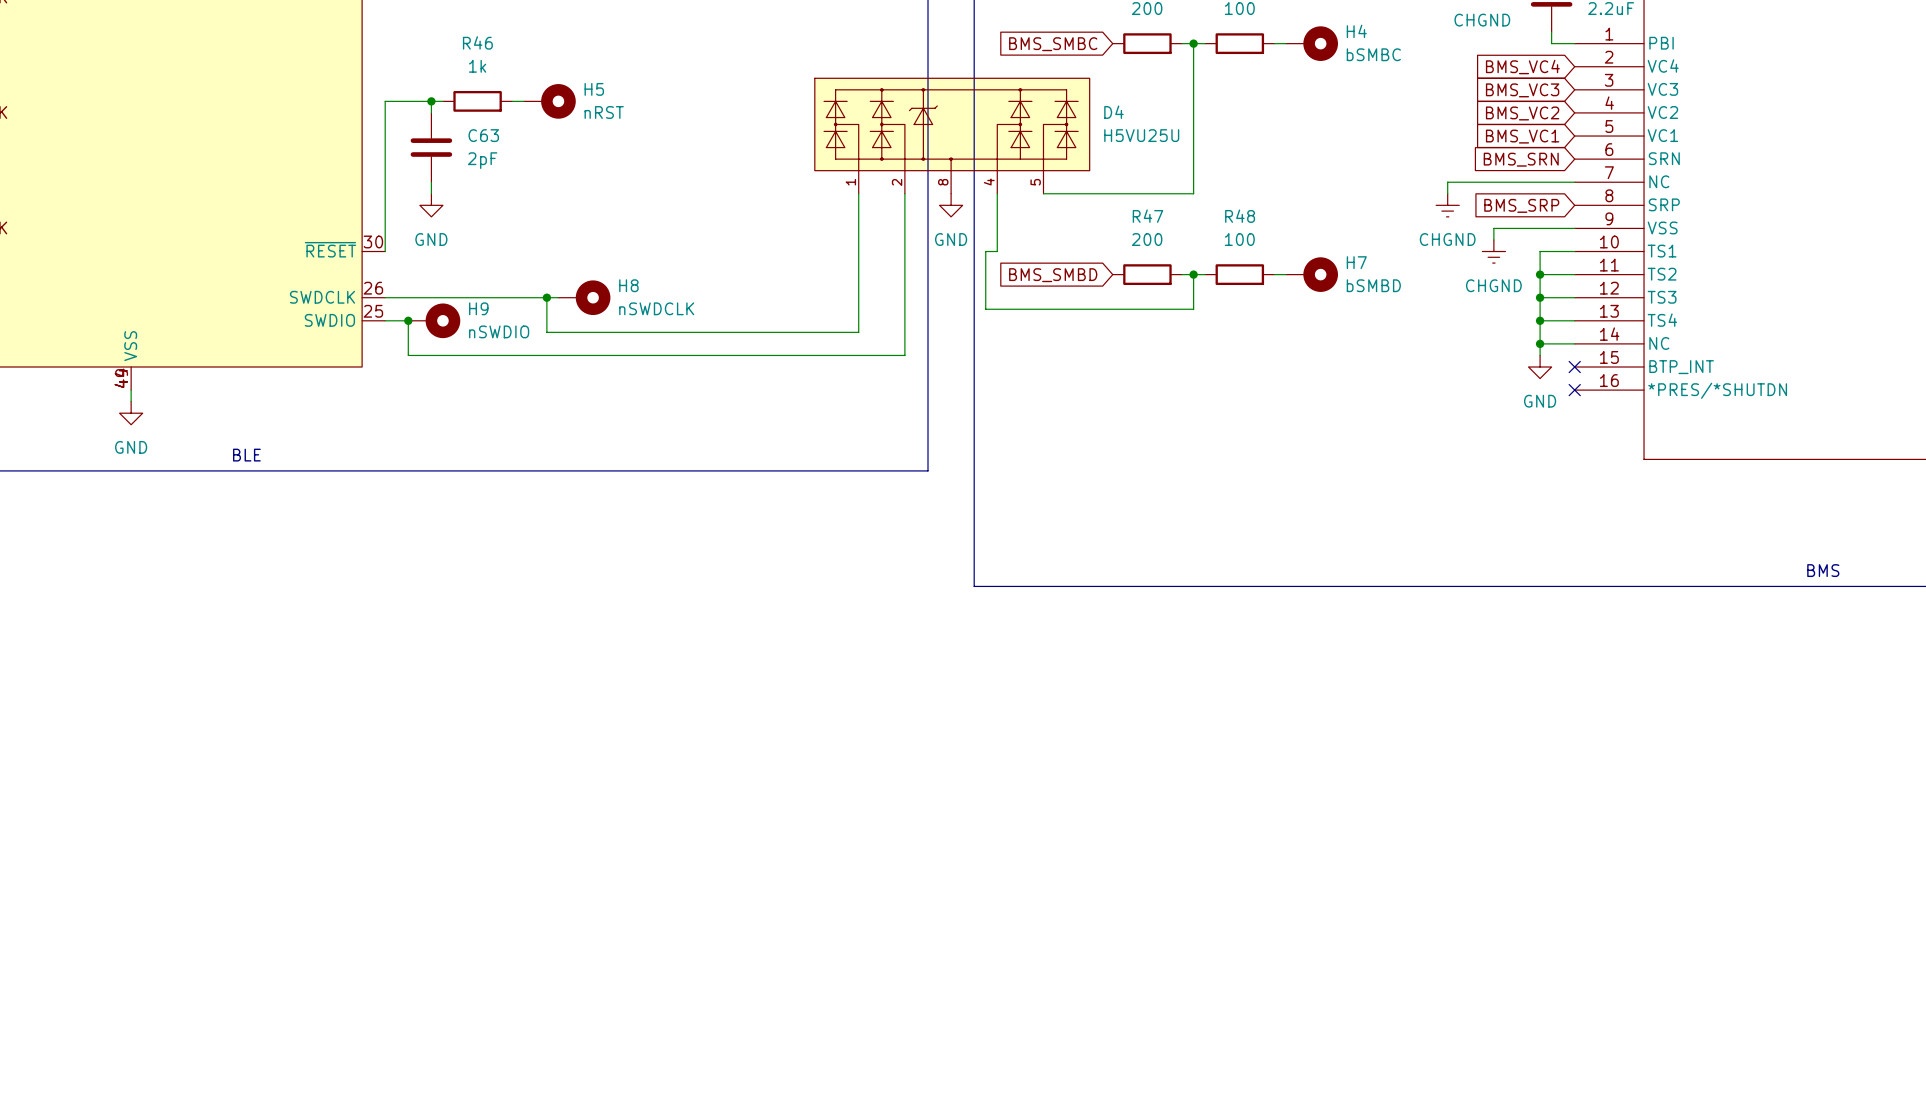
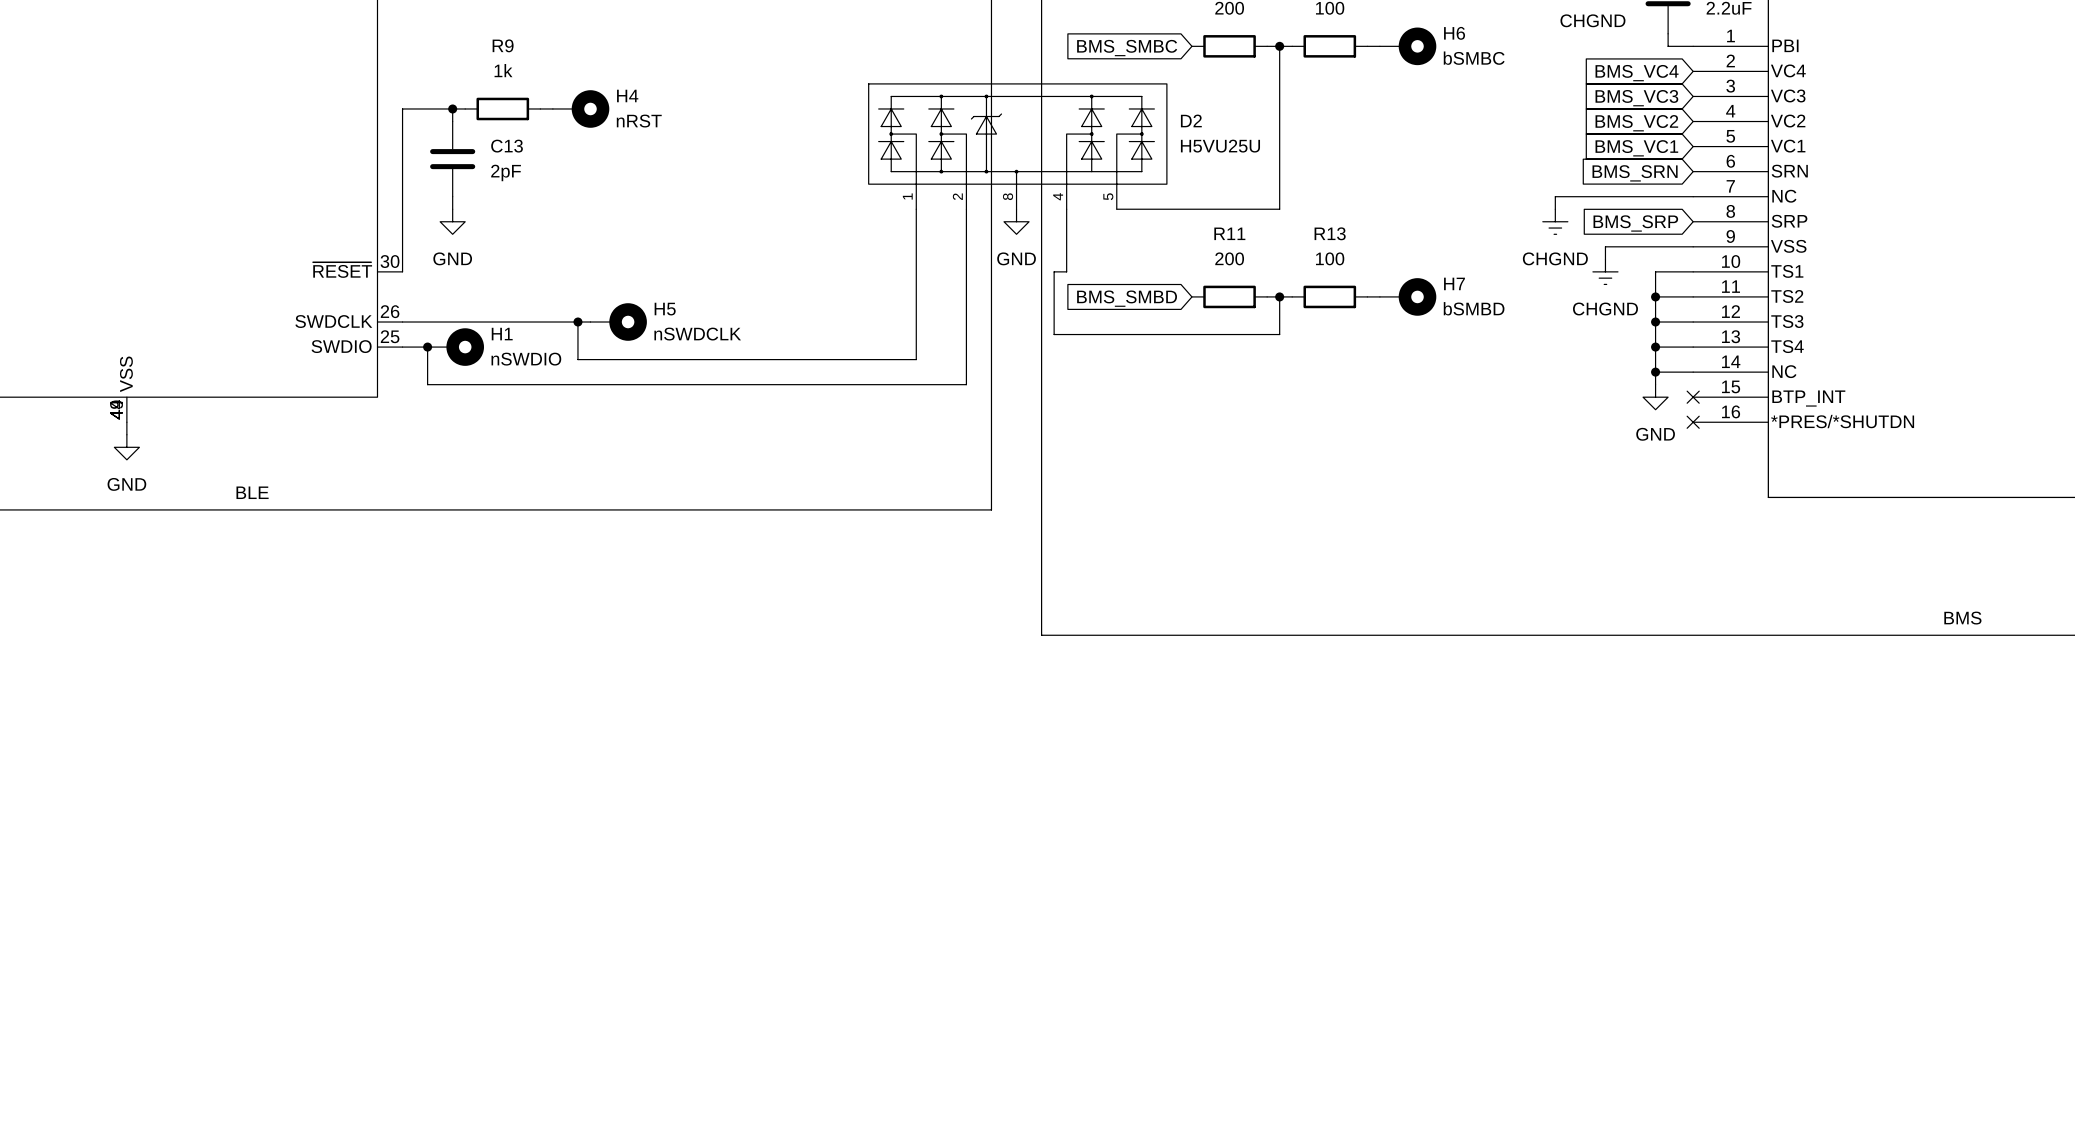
H4 name: H4 (1356, 31) -> H6 (1454, 33)
R46 name: R46 (477, 42) -> R9 (503, 45)
H5 name: H5 (594, 89) -> H4 (627, 95)
D4 name: D4 (1113, 112) -> D2 (1191, 120)
C63 name: C63 (483, 135) -> C13 (507, 146)
R47 name: R47 (1147, 216) -> R11 (1229, 233)
R48 name: R48 (1240, 216) -> R13 (1330, 233)
H8 name: H8 (628, 285) -> H5 (665, 309)
H9 name: H9 (478, 308) -> H1 (502, 334)

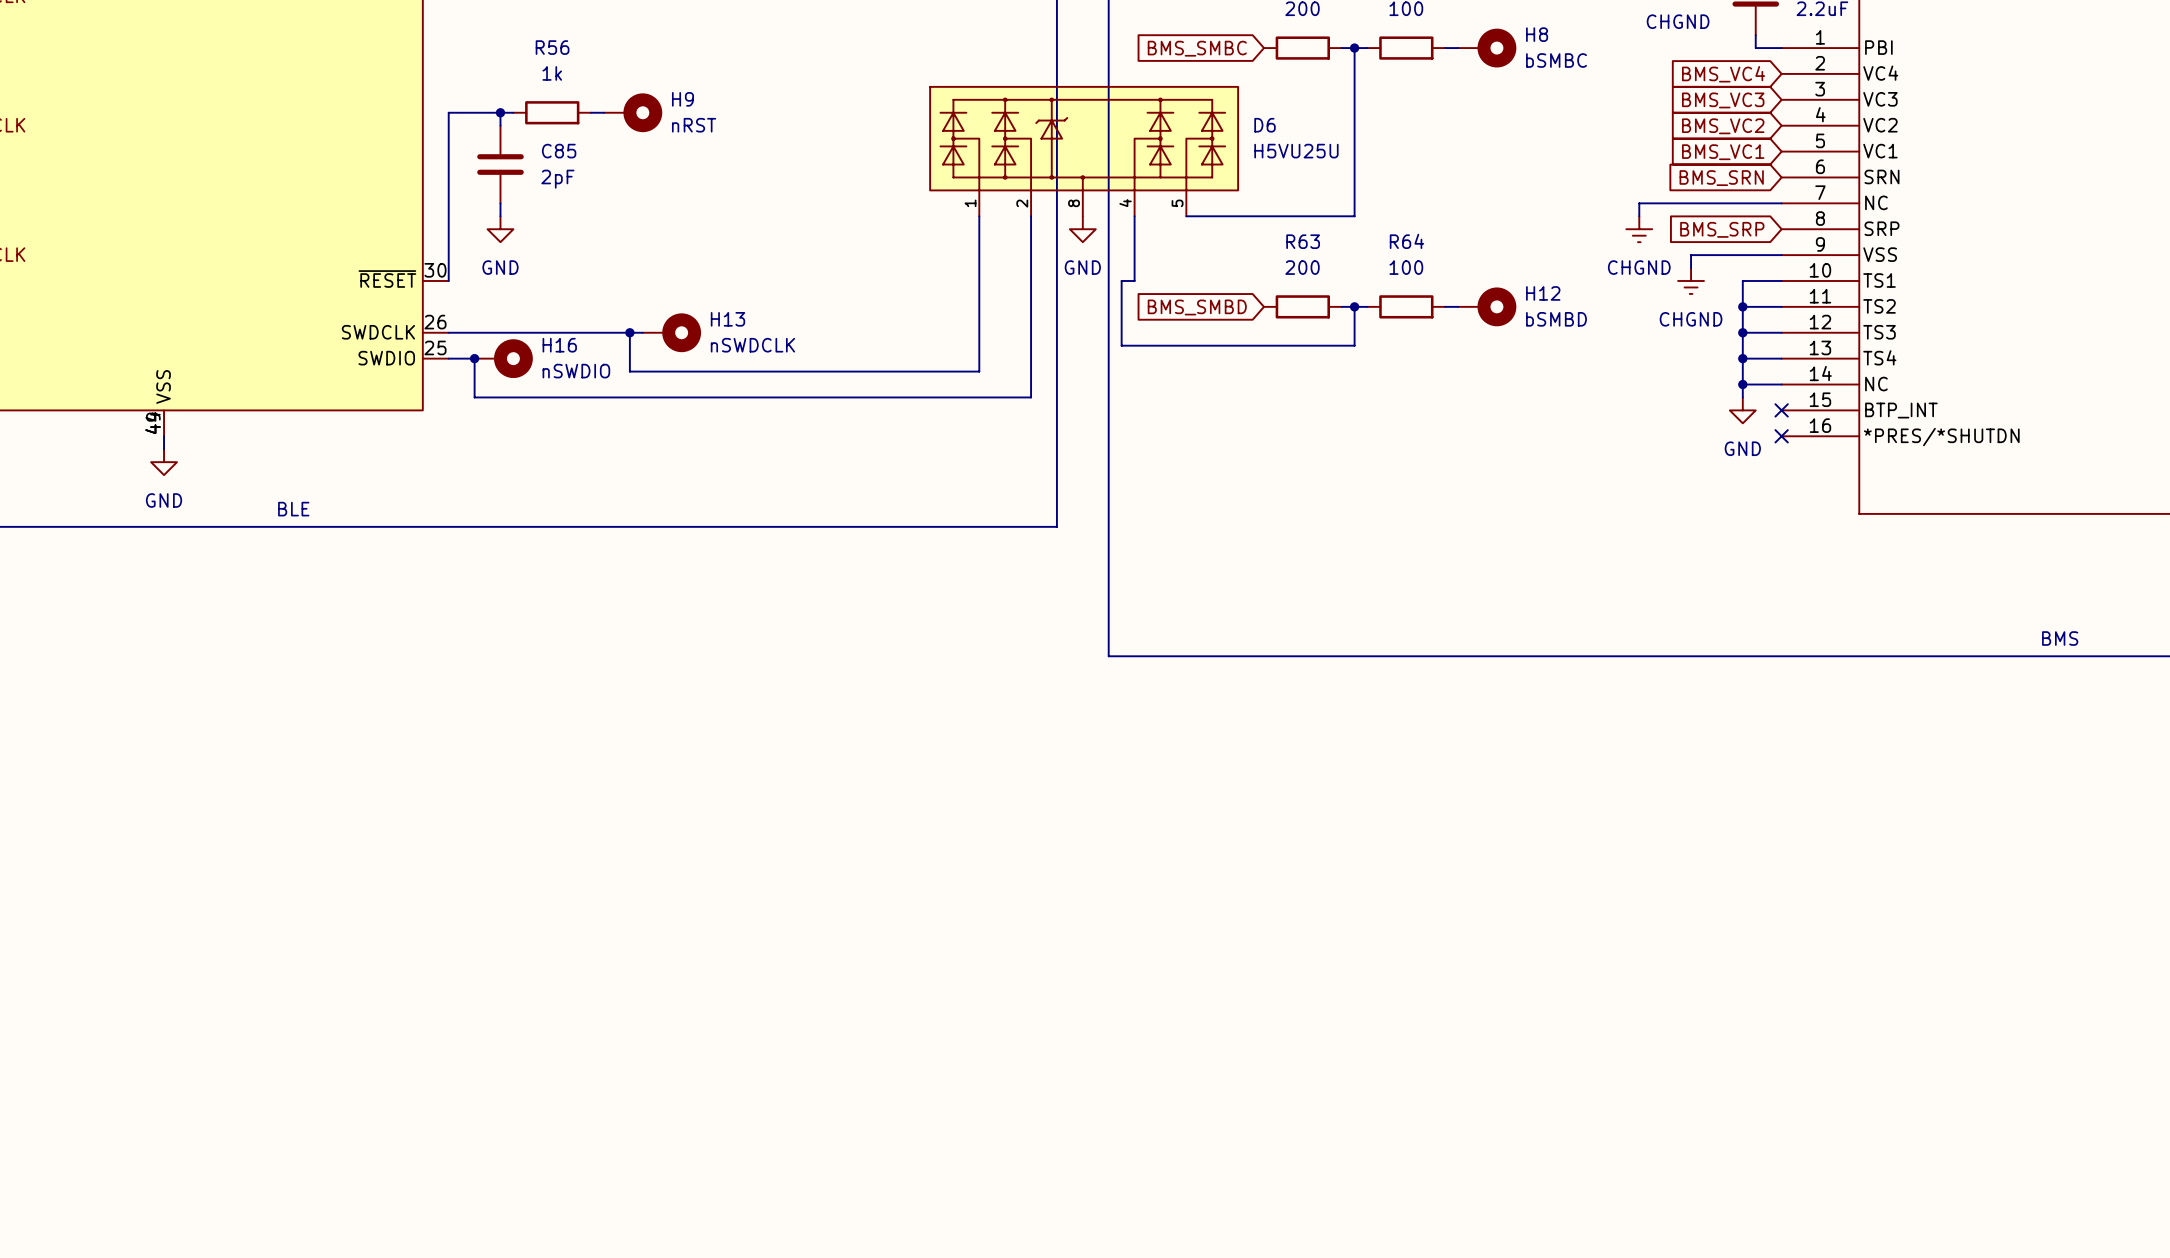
H6 name: H6 (1454, 33) -> H8 (1537, 34)
R9 name: R9 (503, 45) -> R56 (552, 47)
H4 name: H4 (627, 95) -> H9 (682, 99)
D2 name: D2 (1191, 120) -> D6 (1265, 125)
C13 name: C13 (507, 146) -> C85 (559, 151)
R11 name: R11 (1229, 233) -> R63 (1303, 241)
R13 name: R13 (1330, 233) -> R64 (1406, 241)
H7 name: H7 (1454, 283) -> H12 (1543, 293)
H5 name: H5 (665, 309) -> H13 (727, 319)
H1 name: H1 (502, 334) -> H16 (559, 345)

